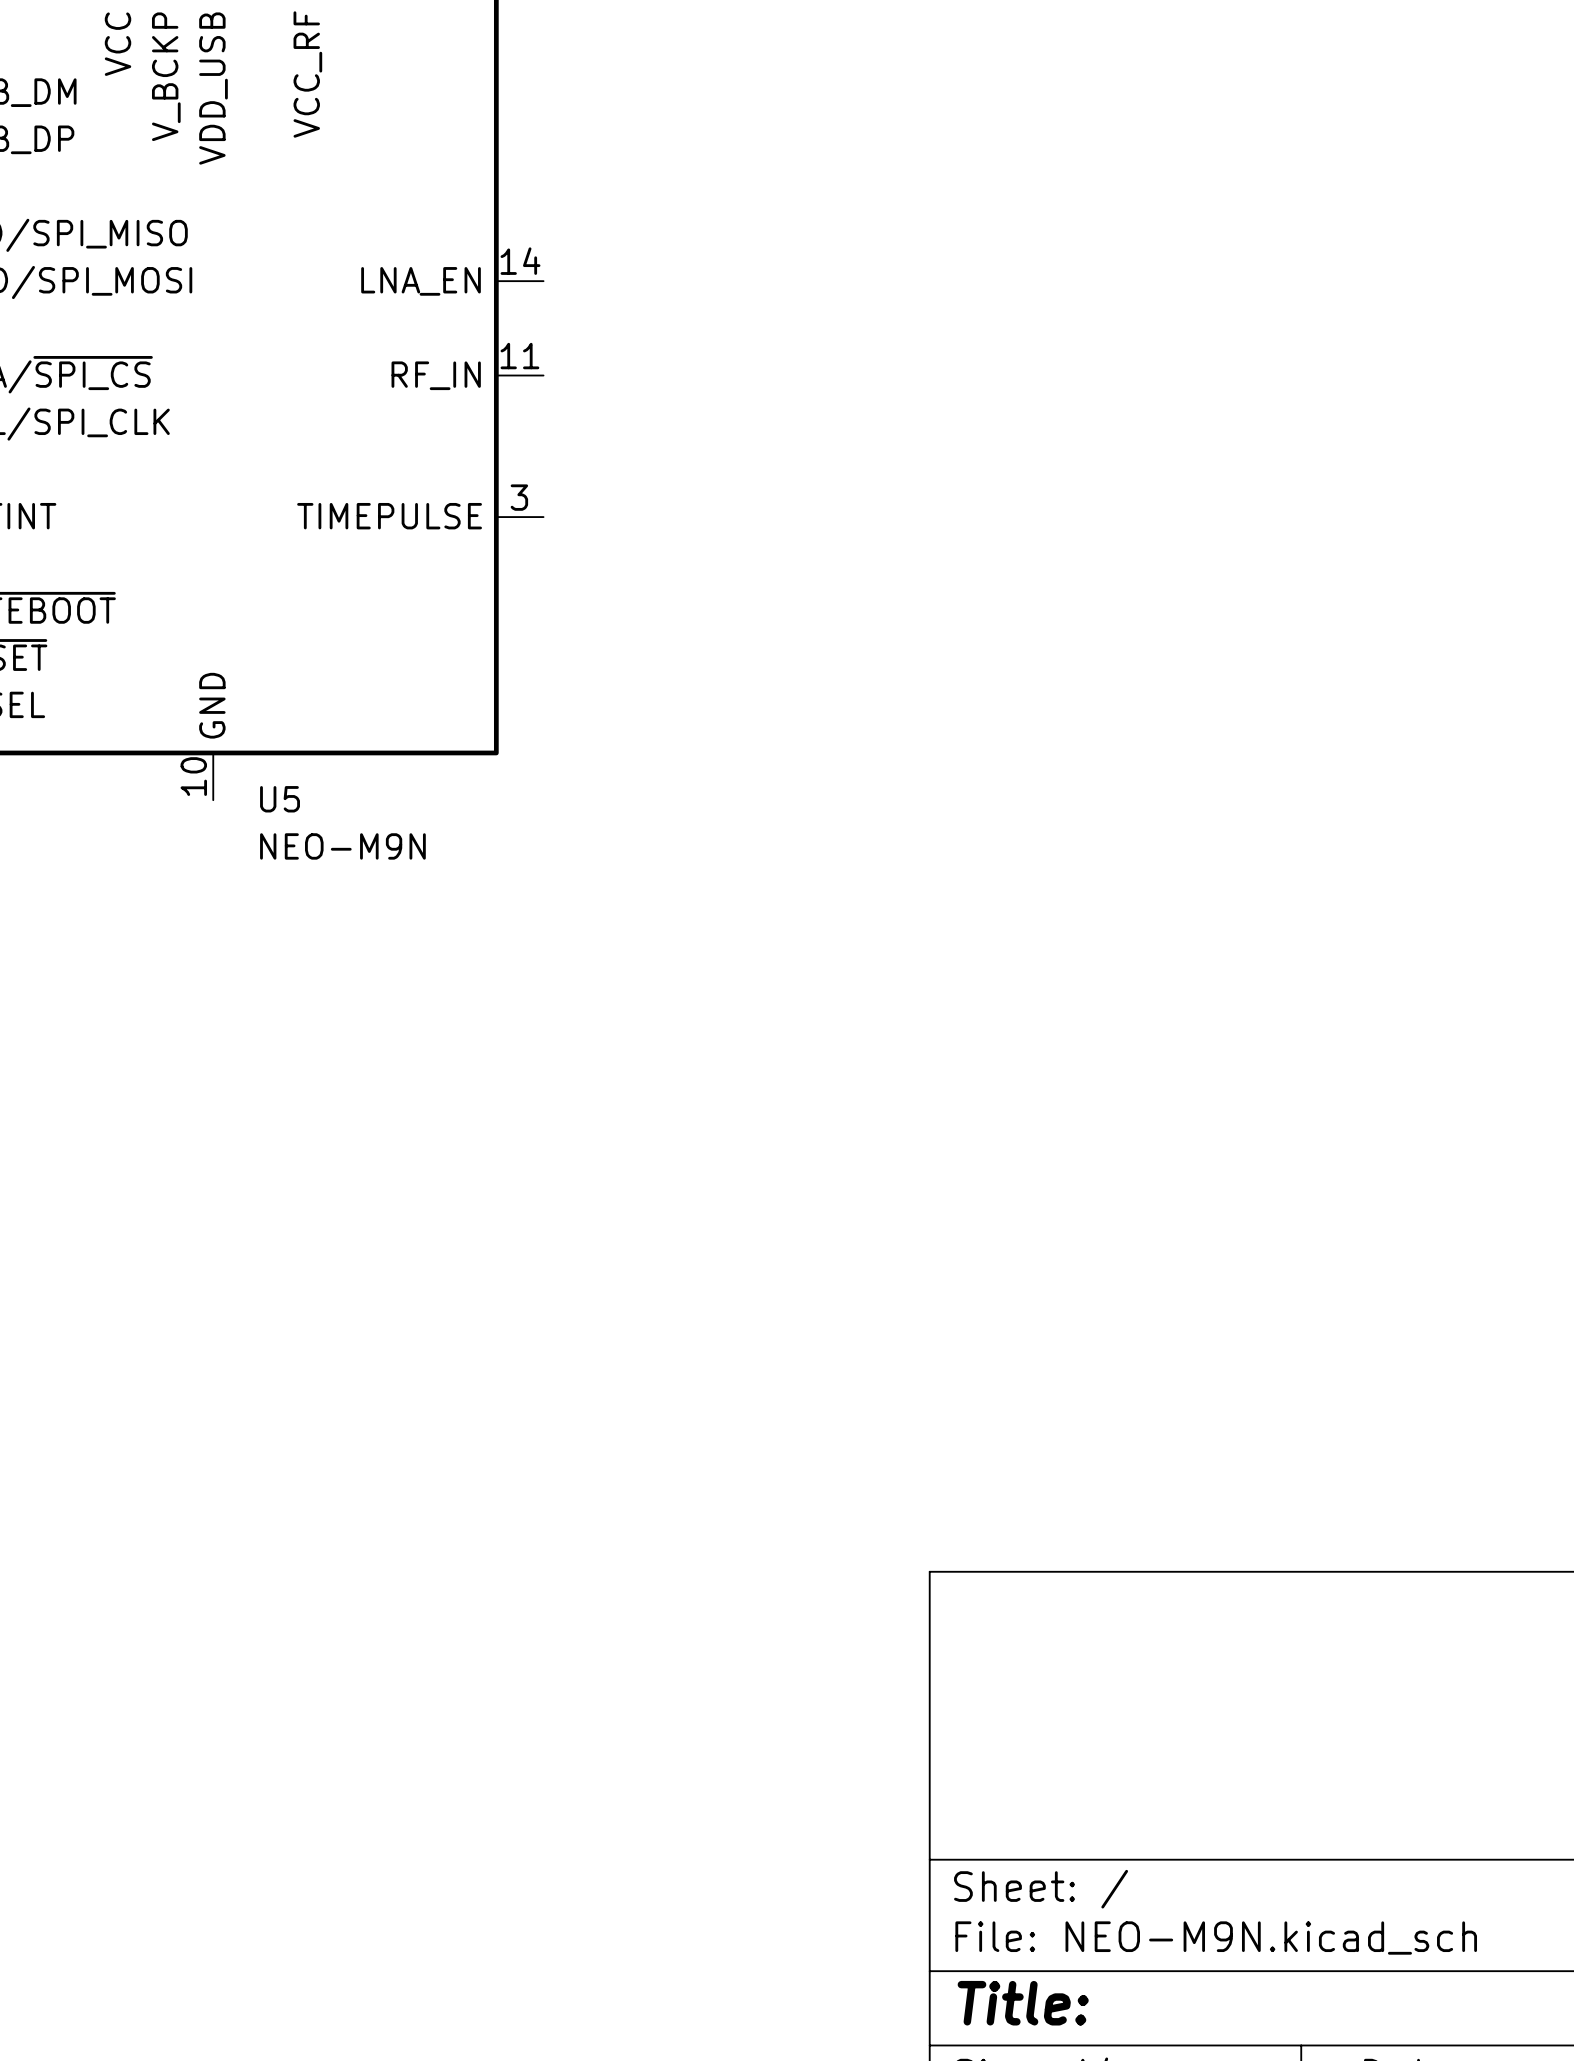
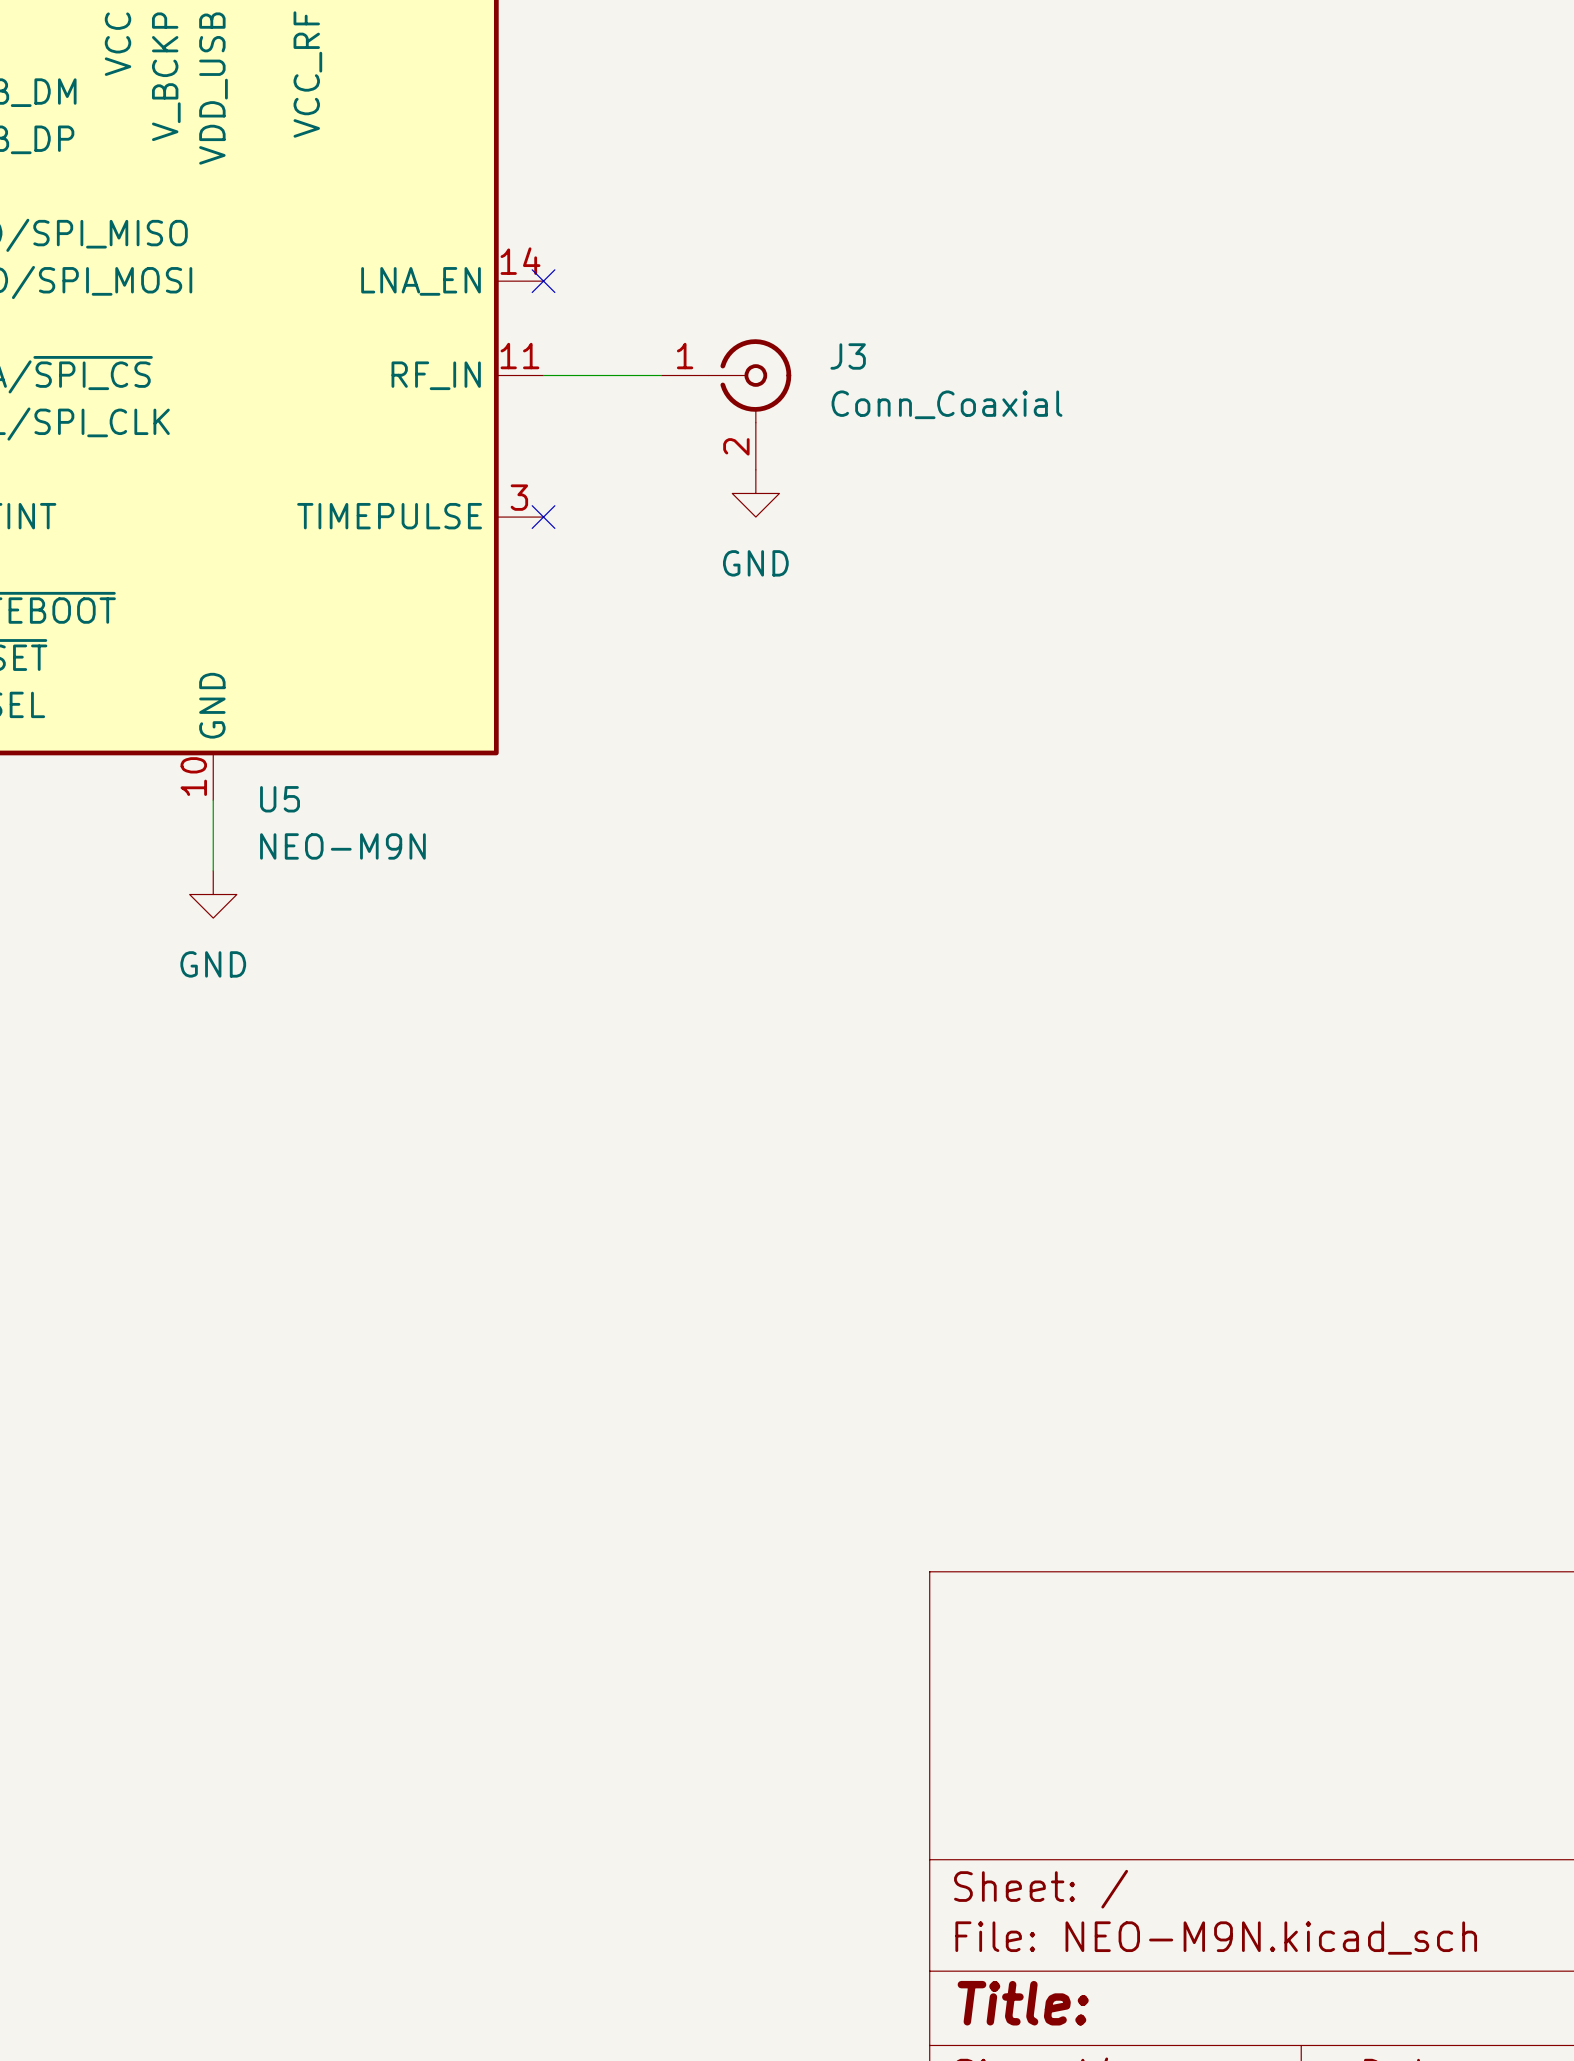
no-connect mark: none -> (543, 281)
wire: none -> (543, 375) (661, 375)
J3: none -> Conn_Coaxial (726, 404)
power symbol: none -> GND (755, 493)
no-connect mark: none -> (543, 517)
wire: none -> (213, 800) (213, 870)
power symbol: none -> GND (213, 894)

